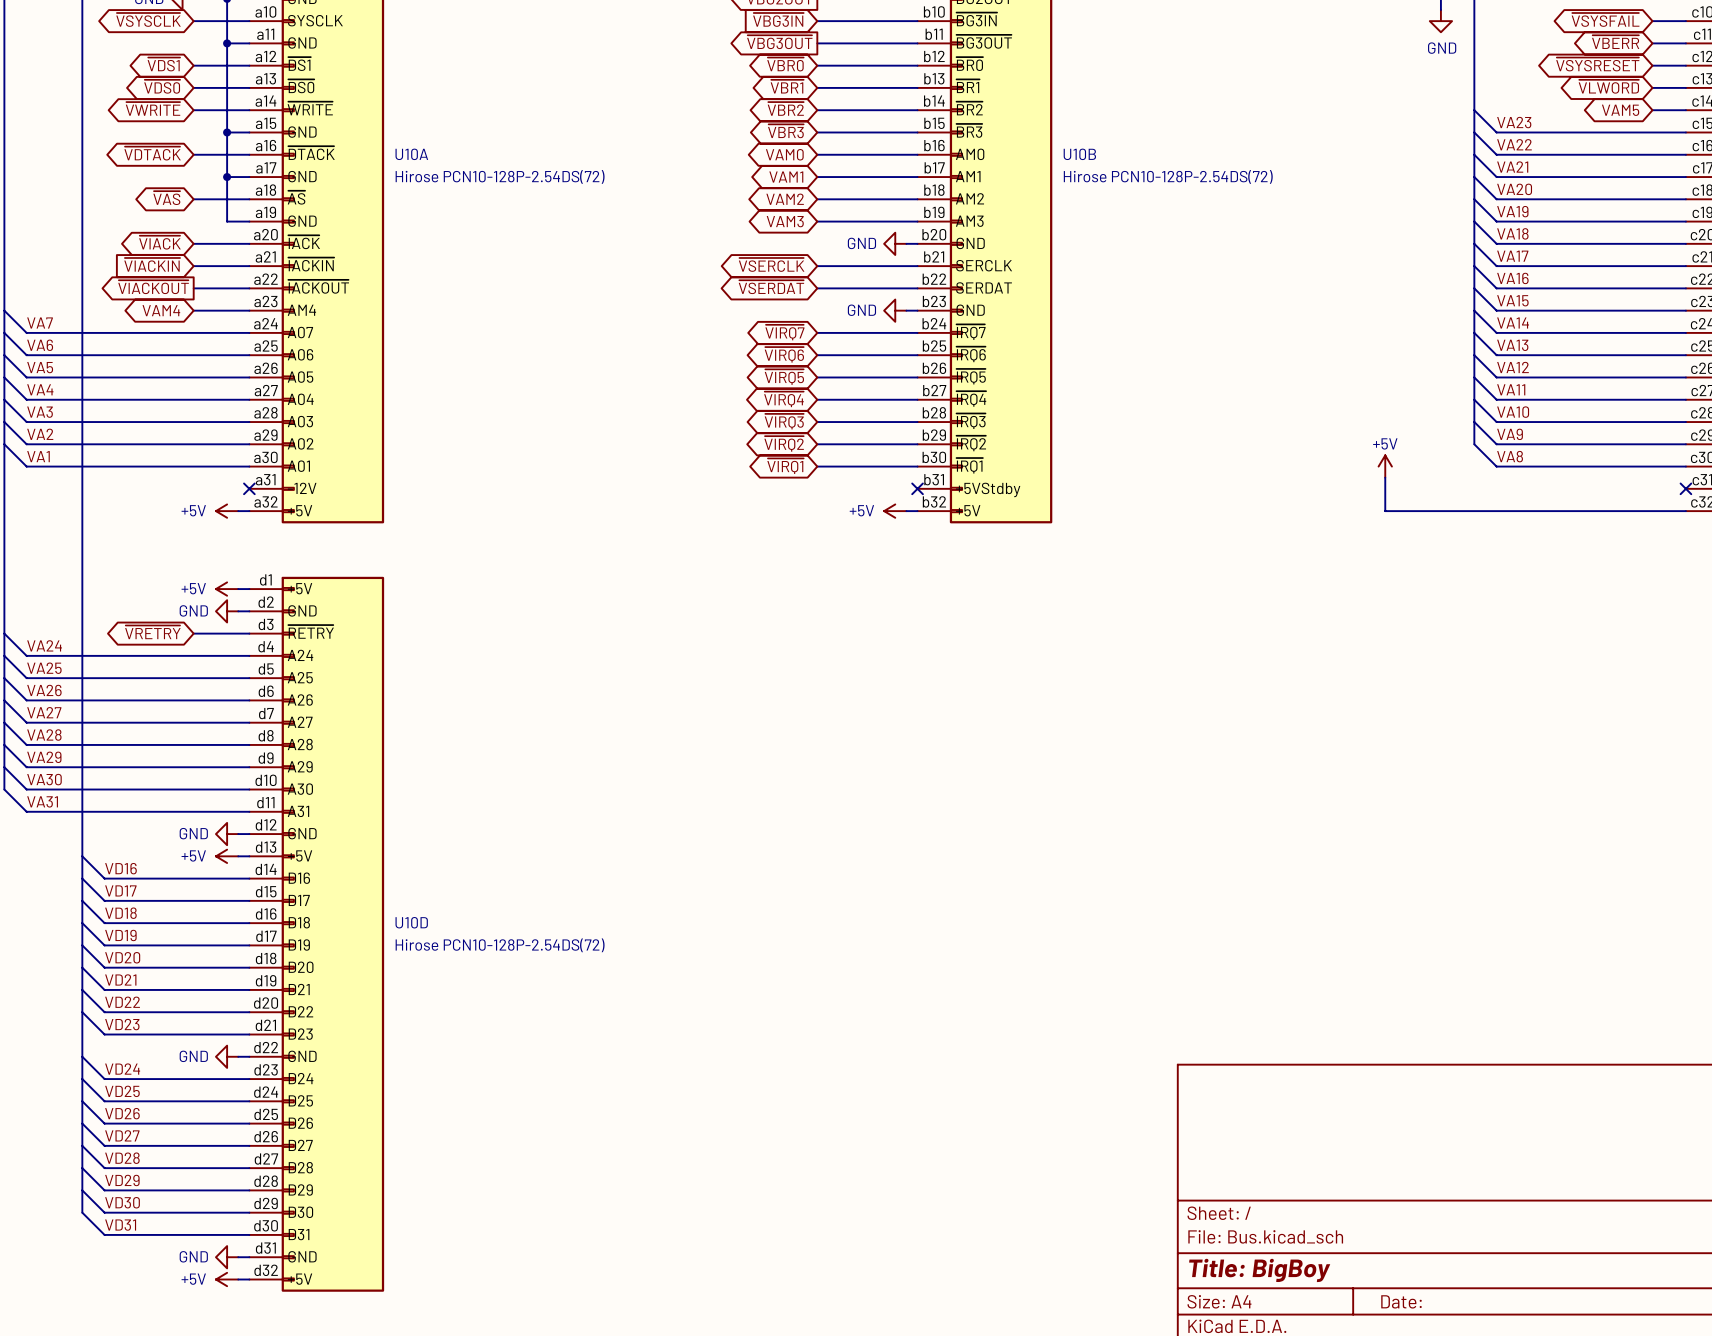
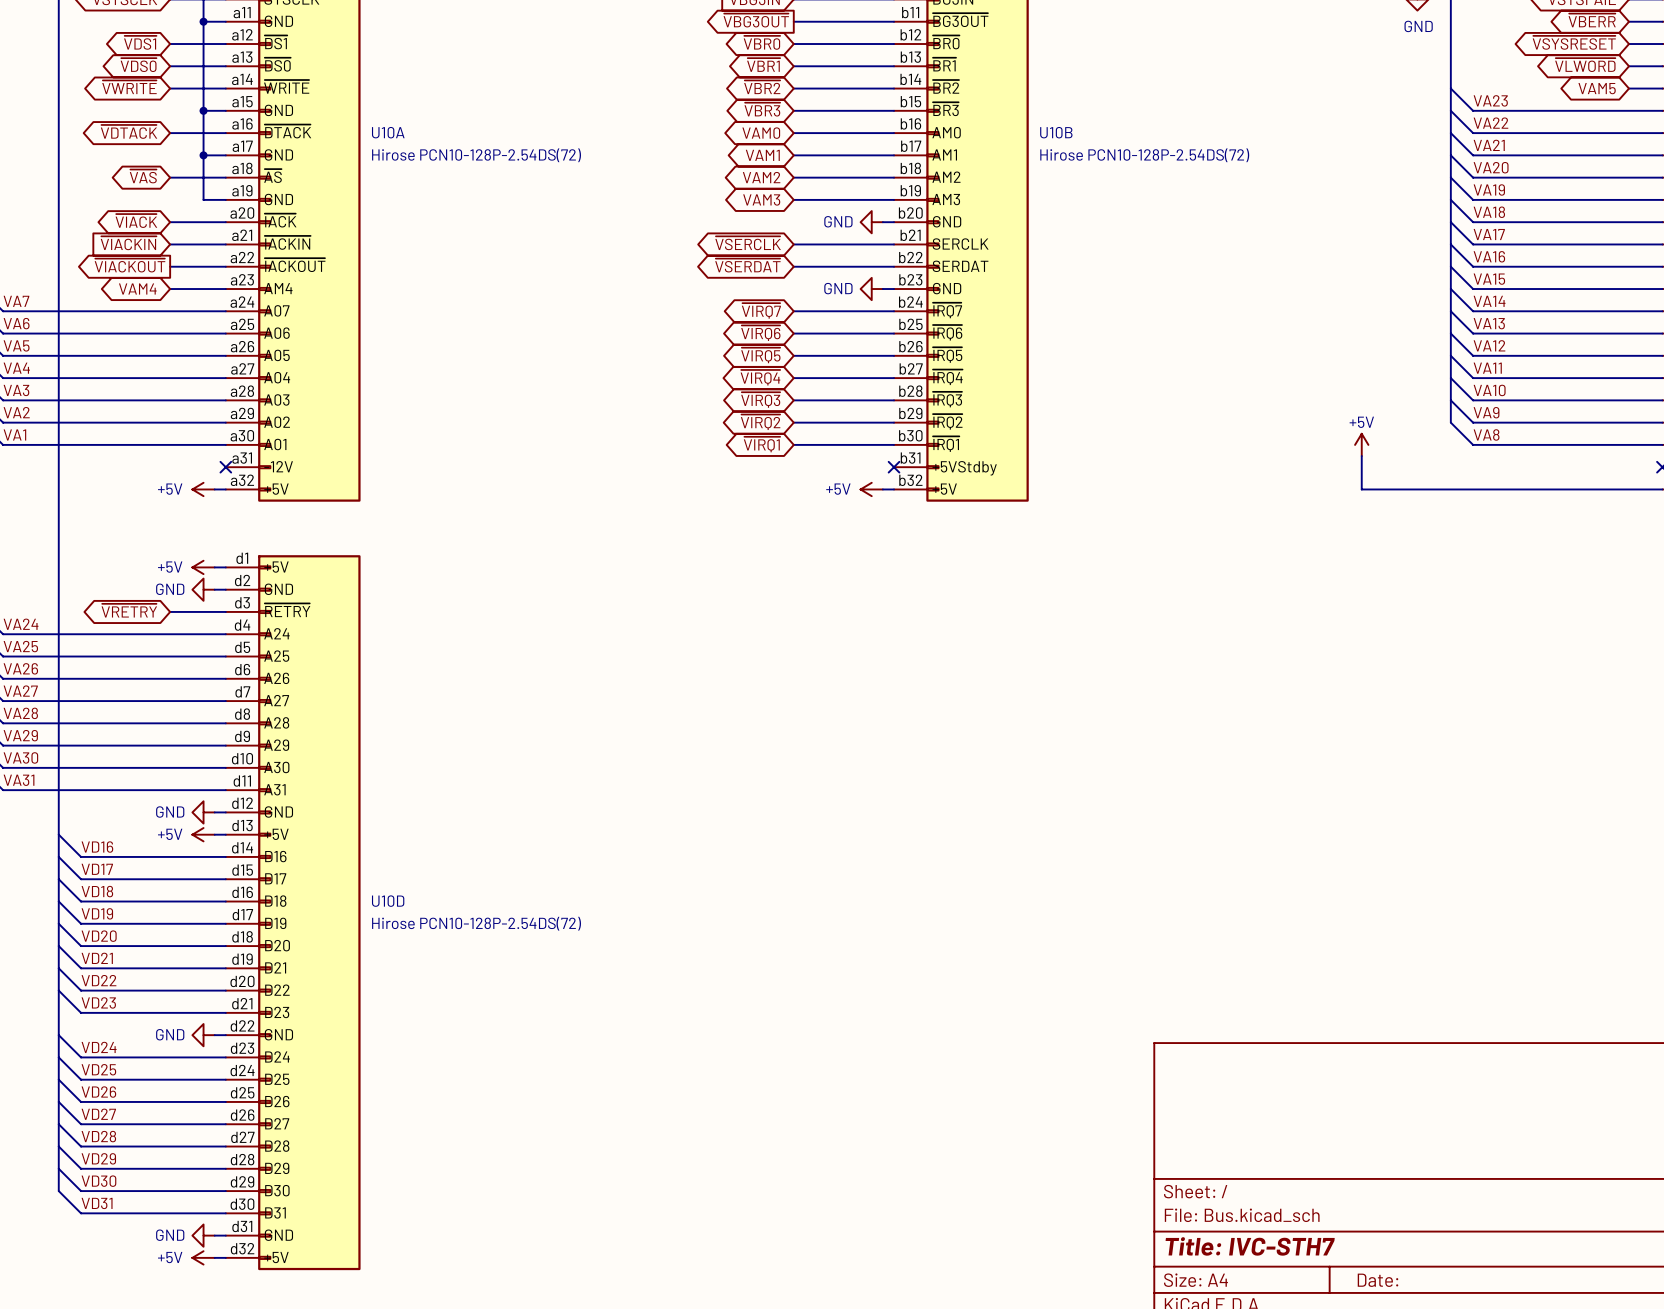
title block: Title: BigBoy (1259, 1270) -> Title: IVC-STH7 (1250, 1246)

